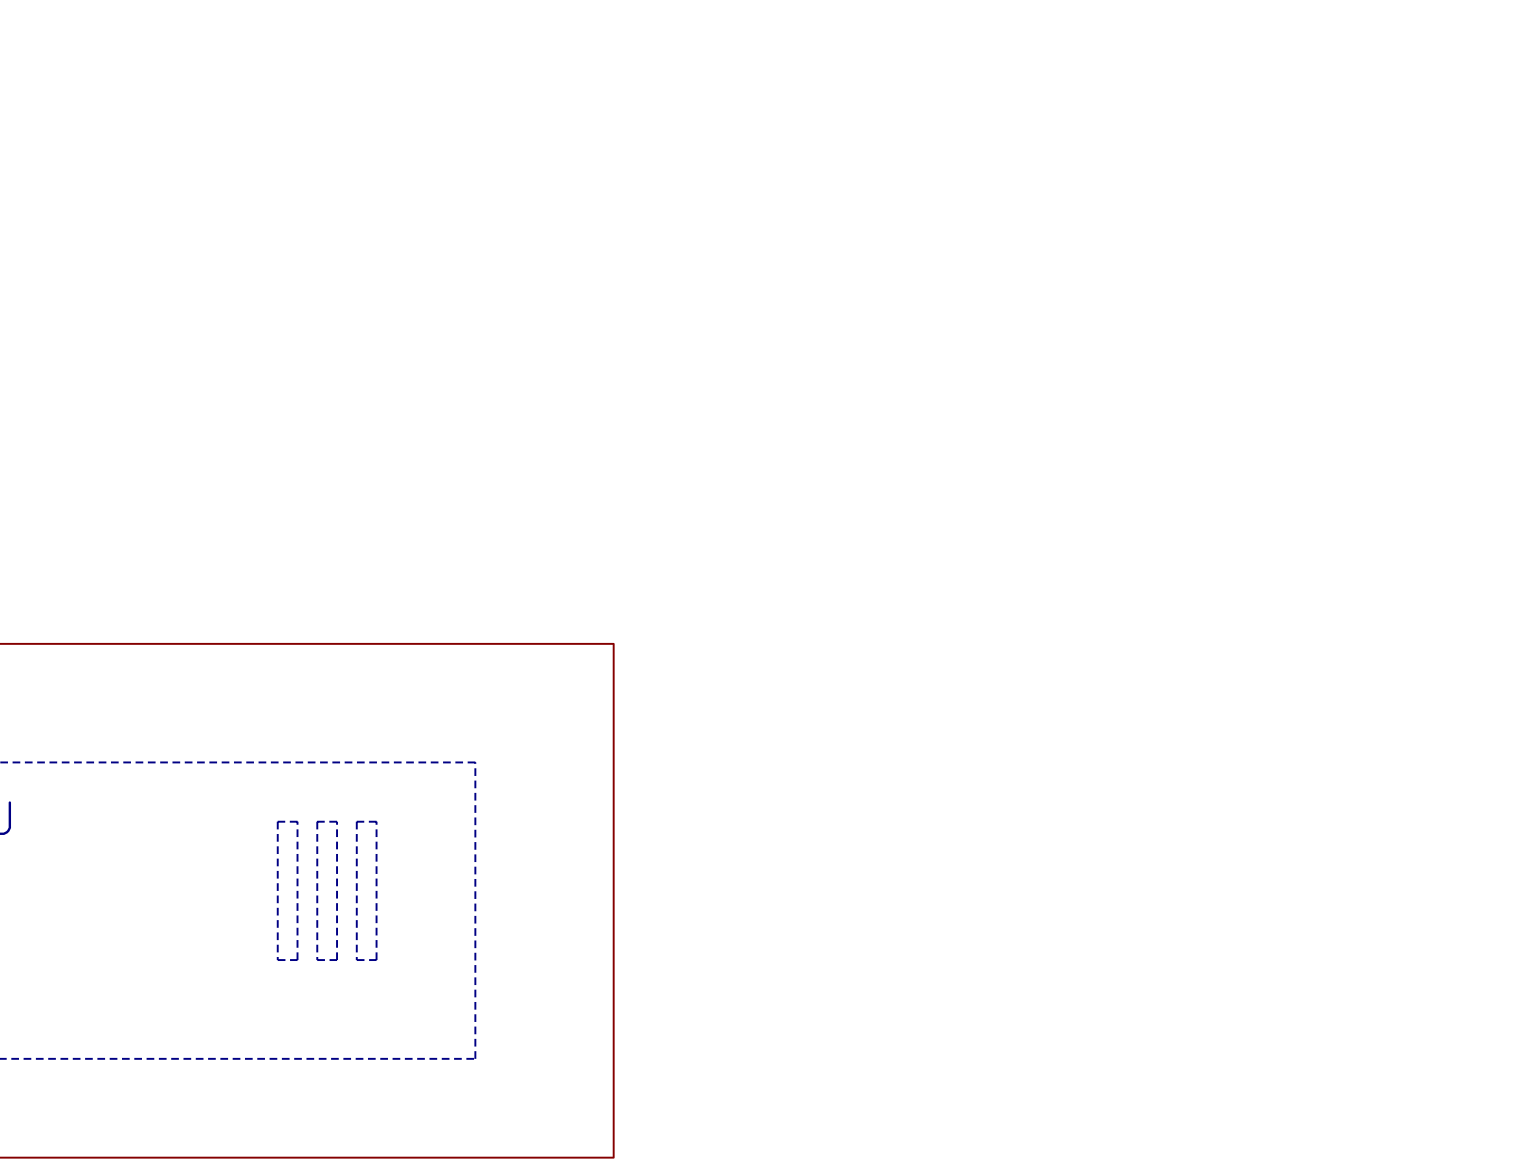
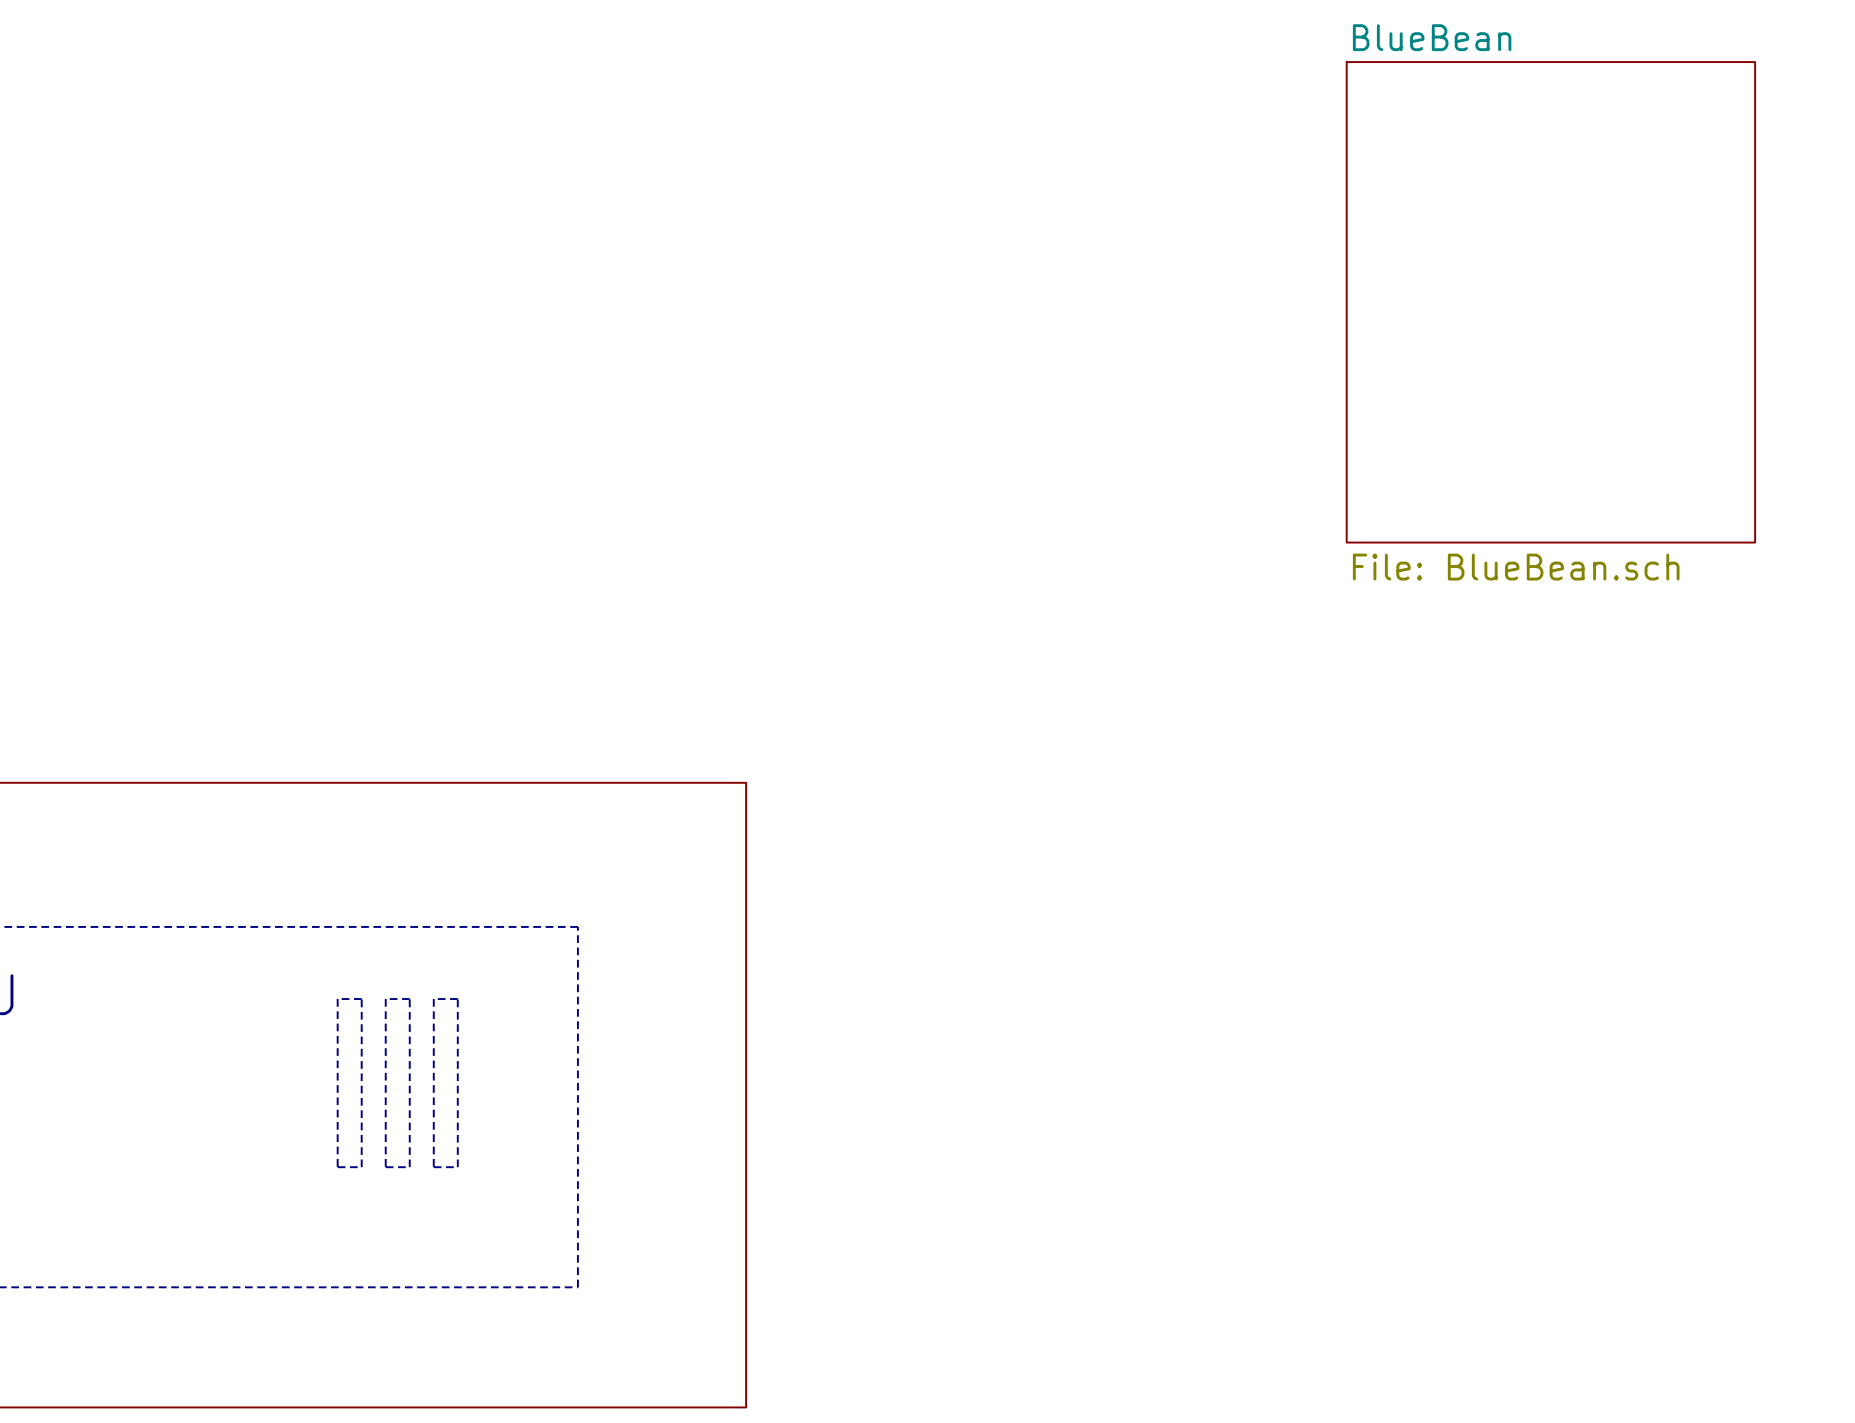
sheet BlueBean: none -> File: BlueBean.sch (1550, 302)

